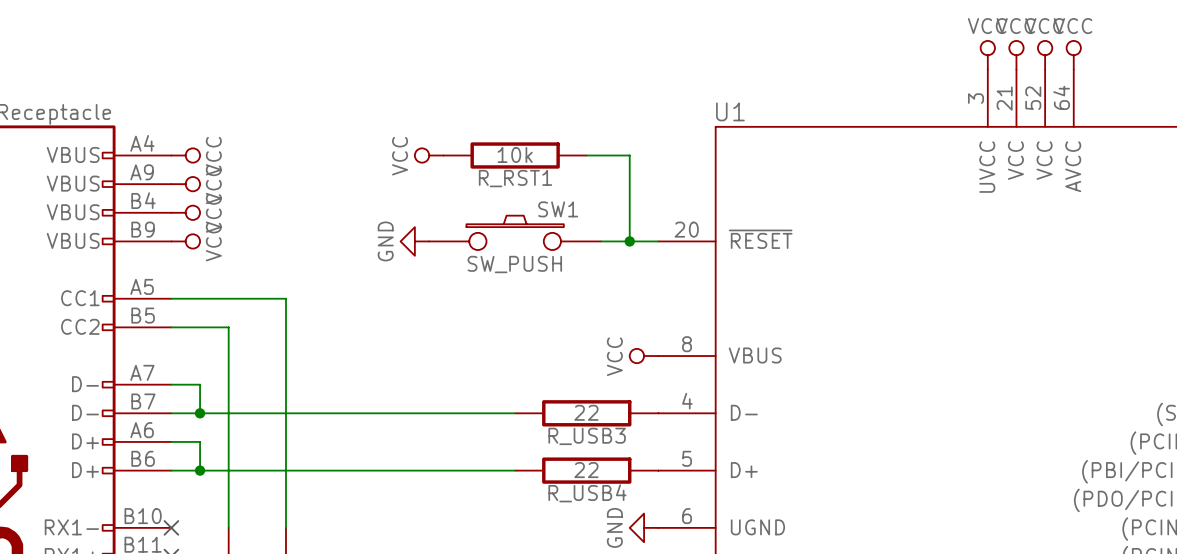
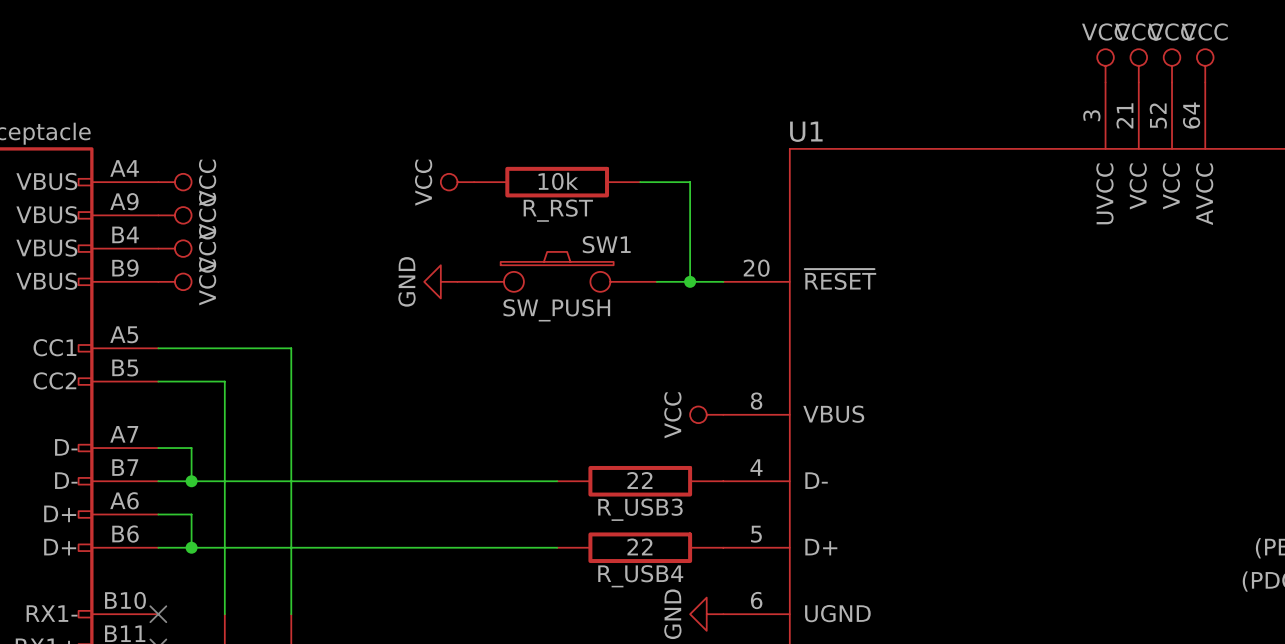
R_RST1 name: R_RST1 (515, 178) -> R_RST (558, 210)

